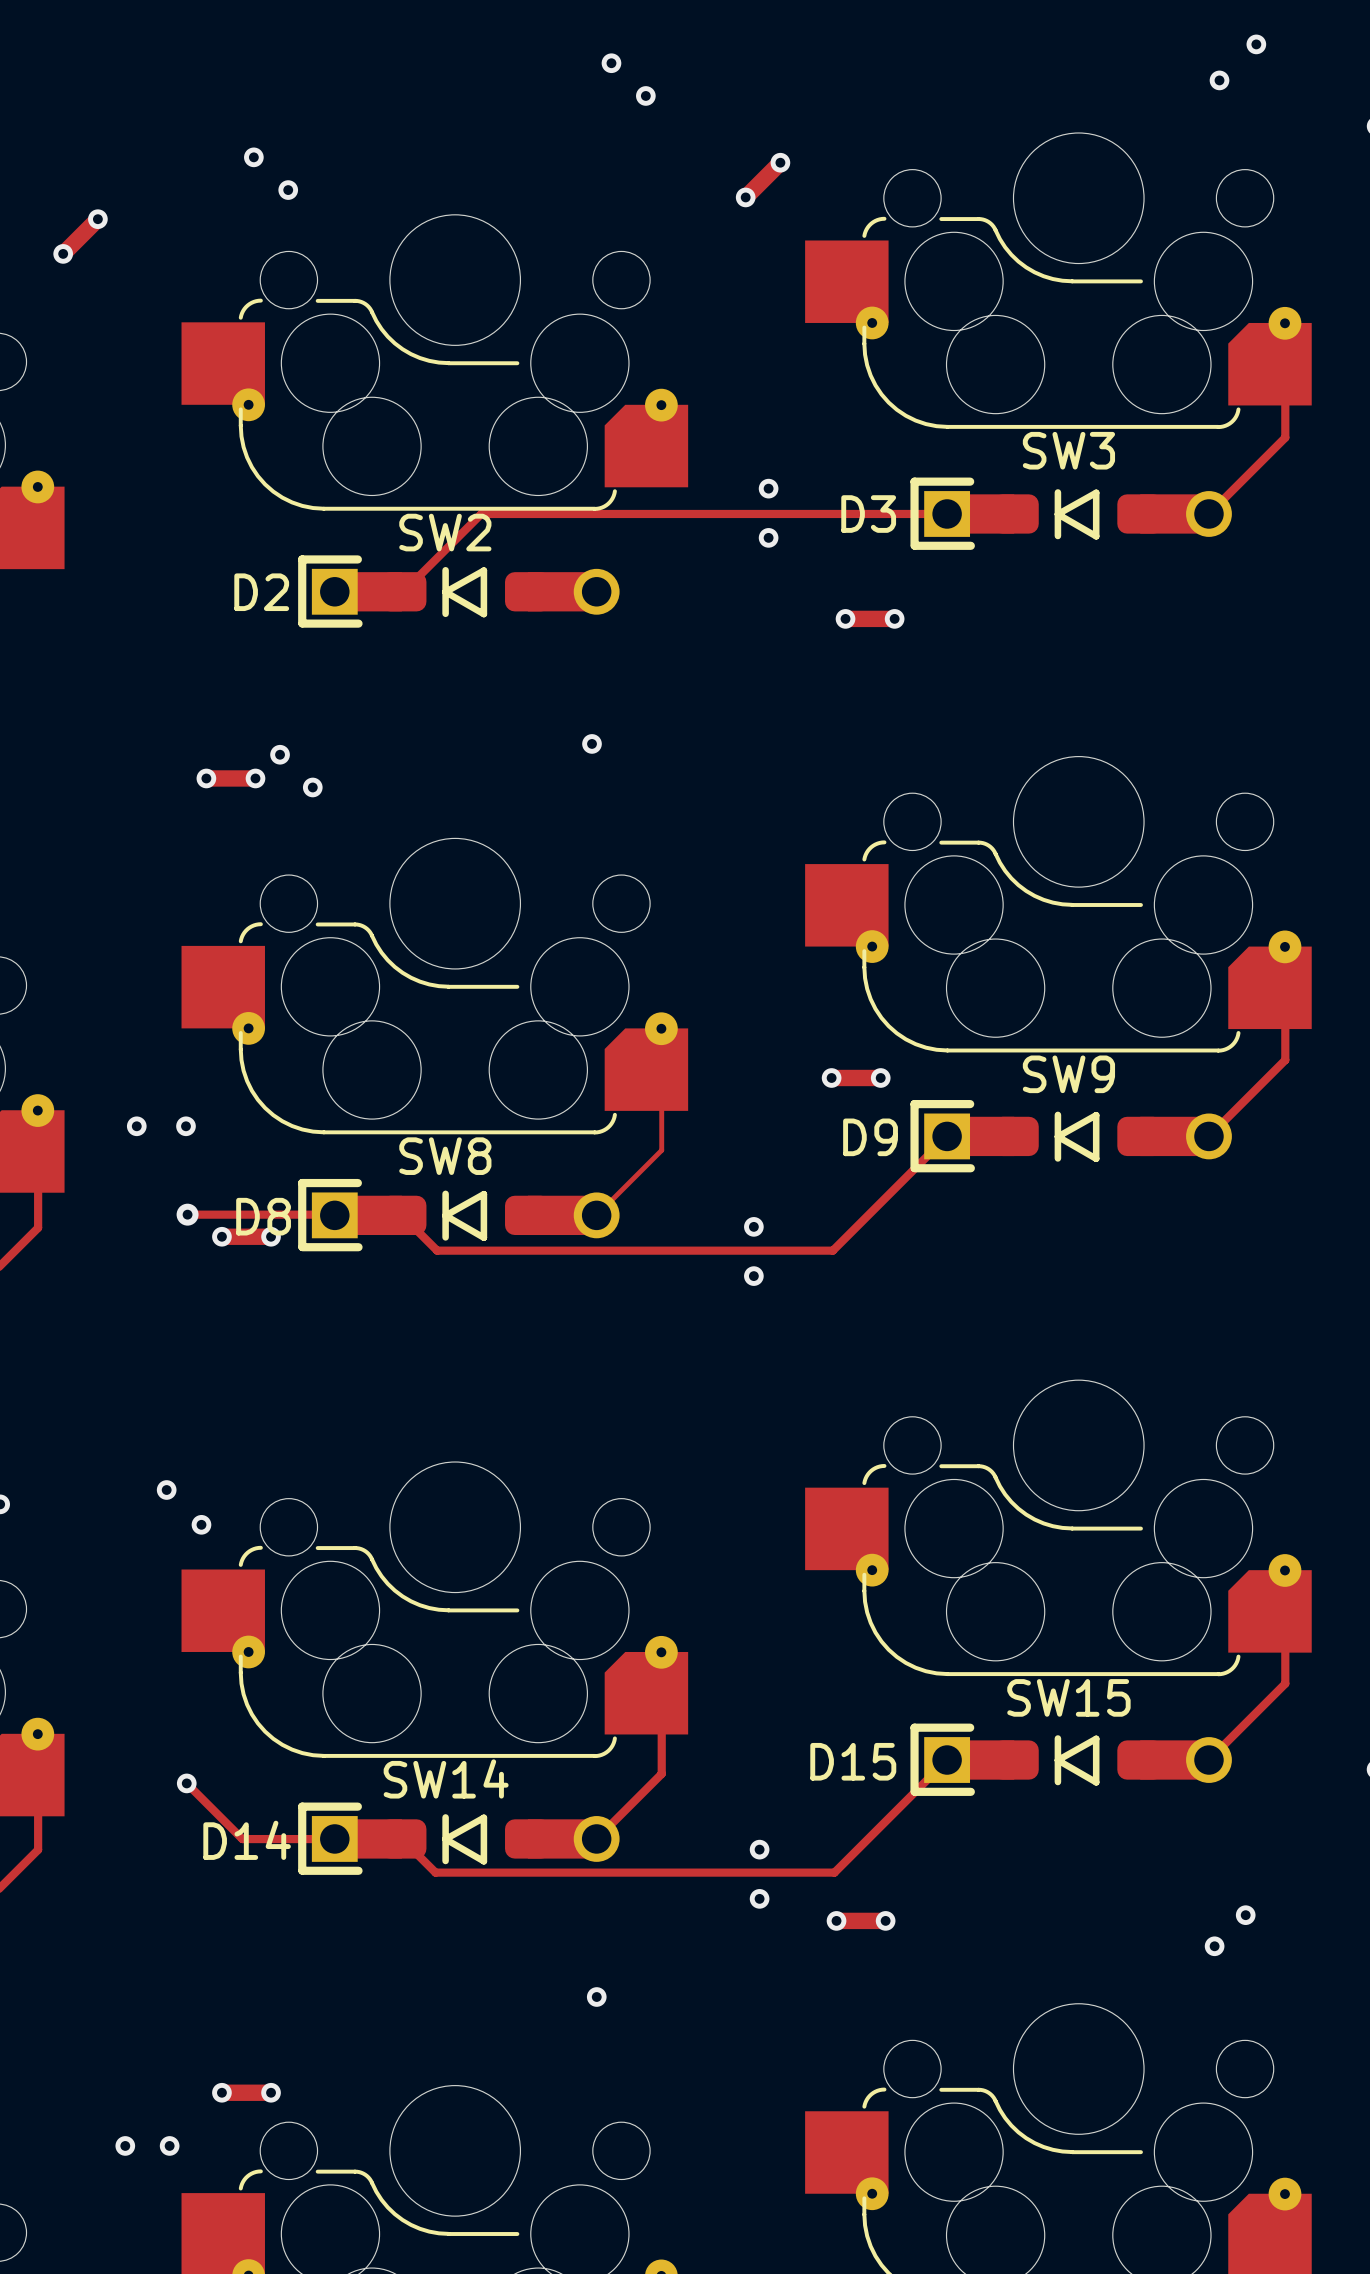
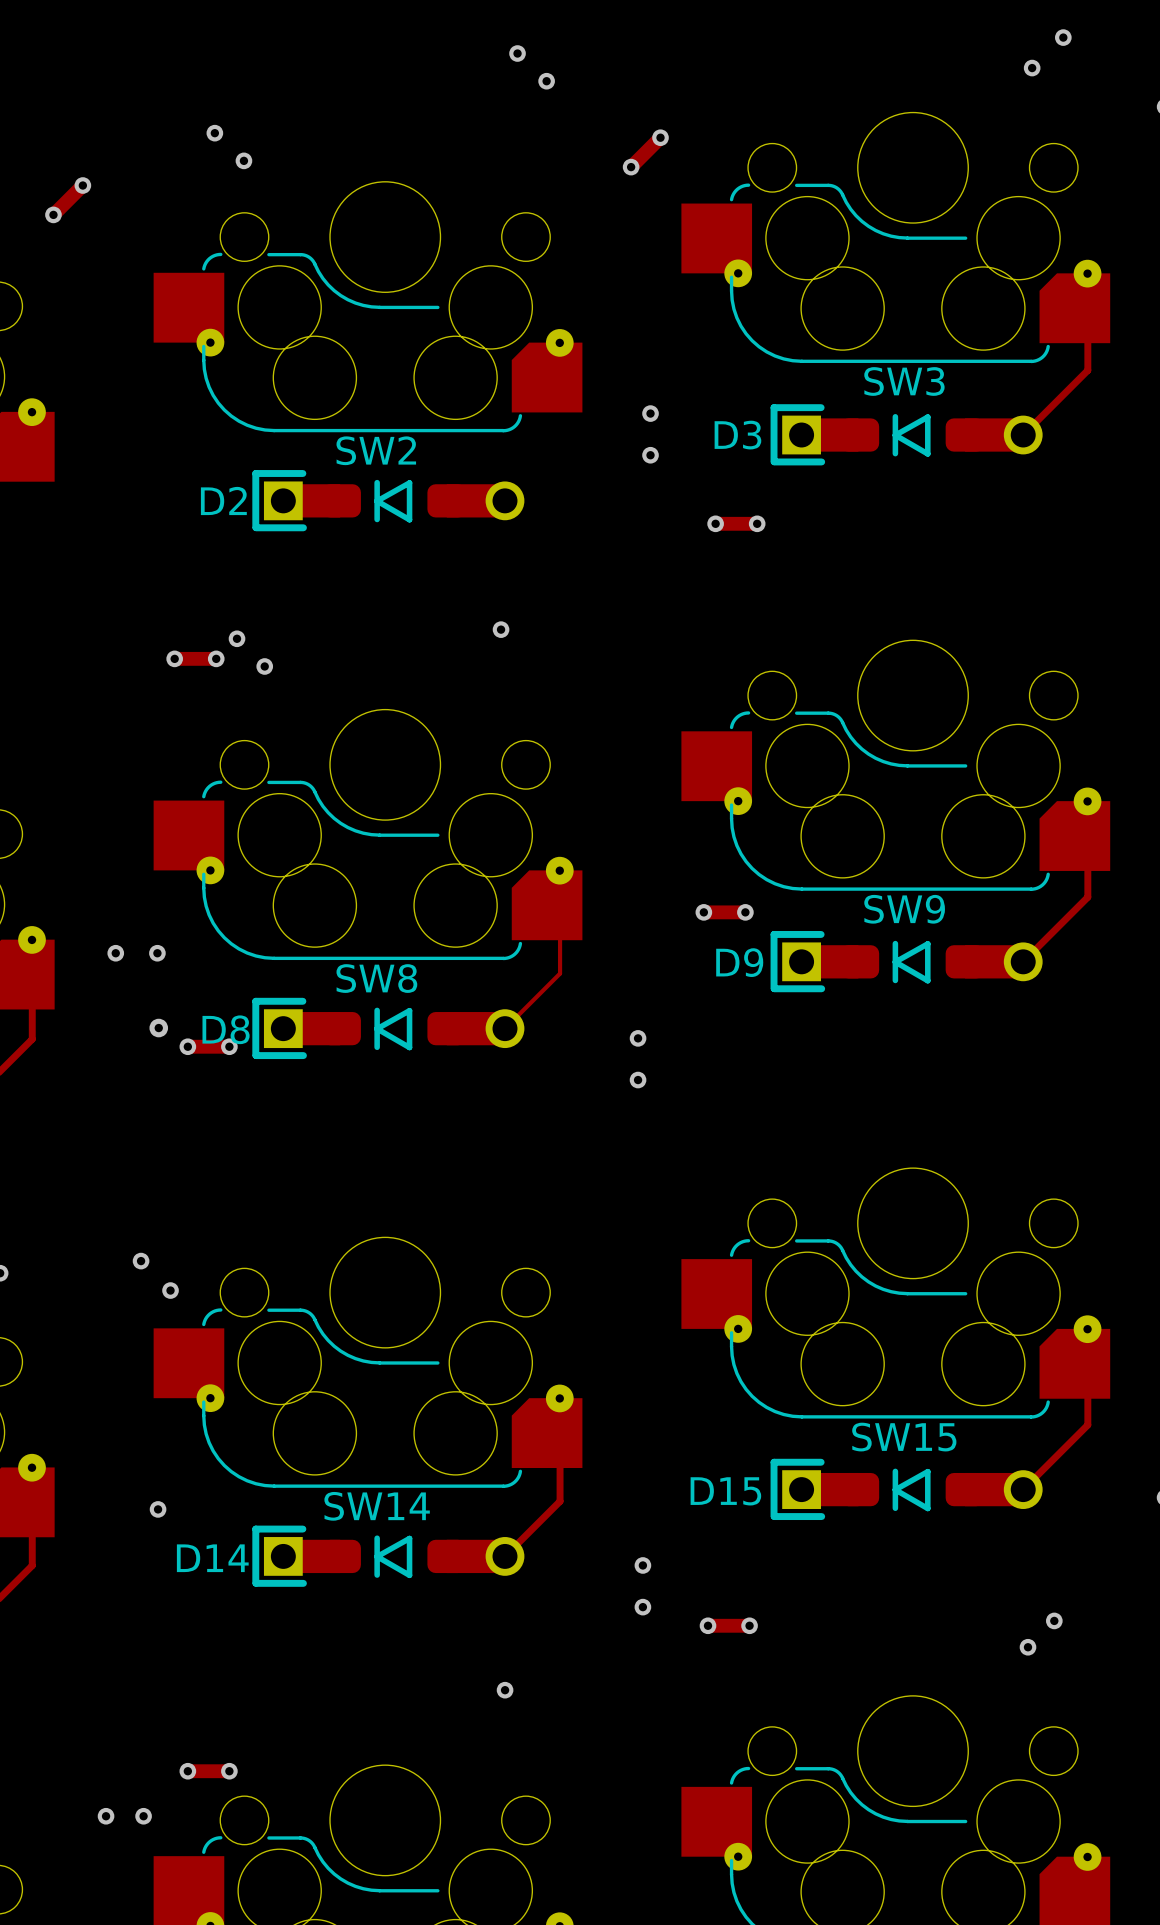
track: (947, 513) (481, 513) (403, 591) -> none
track: (947, 1136) (832, 1250) (437, 1250) (401, 1215) -> none
track: (187, 1214) (334, 1214) -> none
track: (947, 1760) (834, 1872) (435, 1872) (401, 1838) -> none
track: (186, 1783) (242, 1839) (334, 1839) -> none

